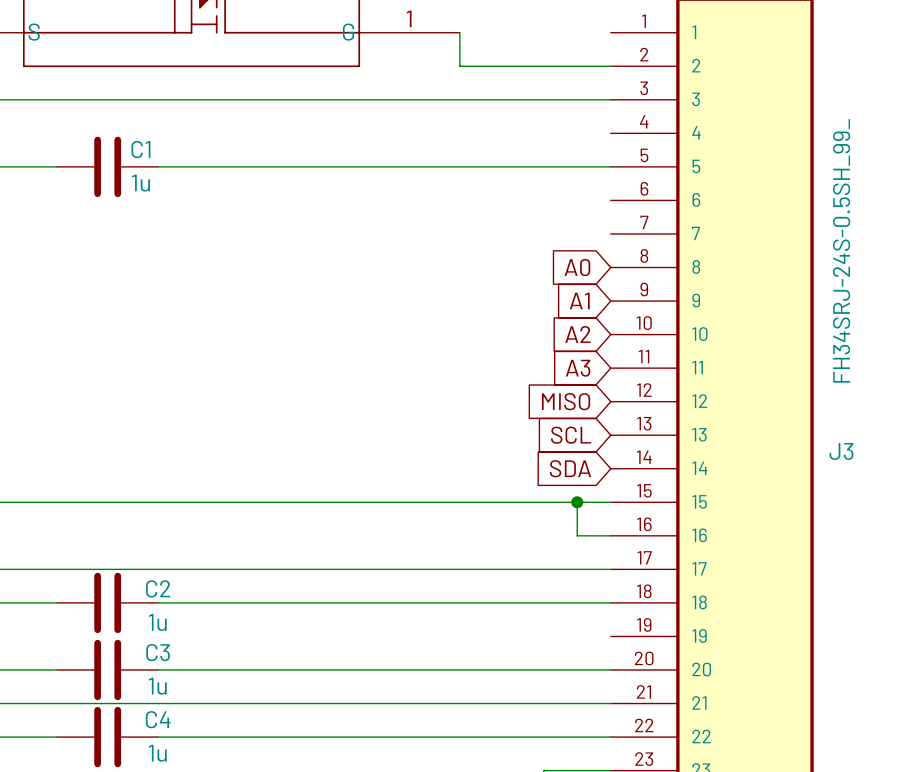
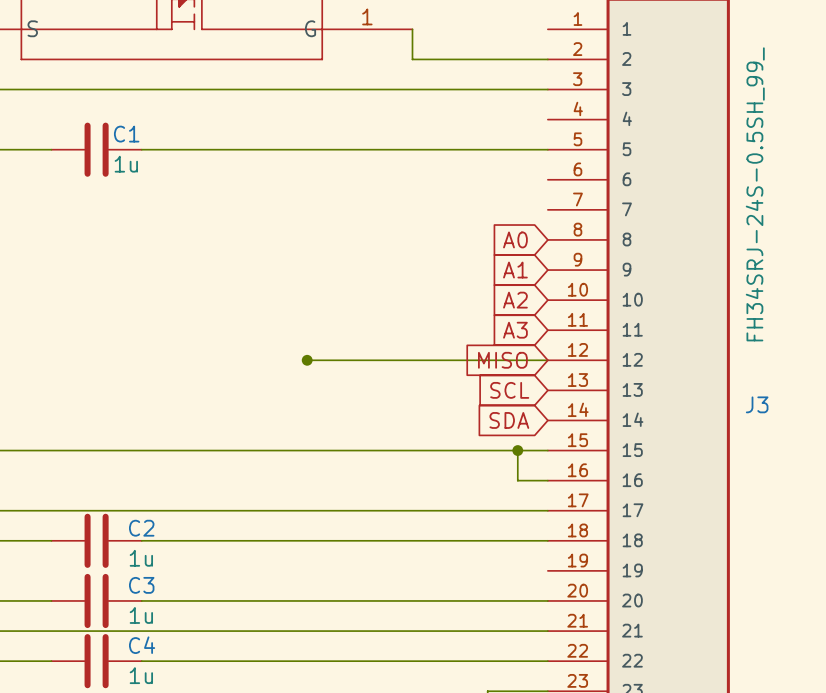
wire: none -> (307, 360) (547, 360)
junction: none -> (307, 360)

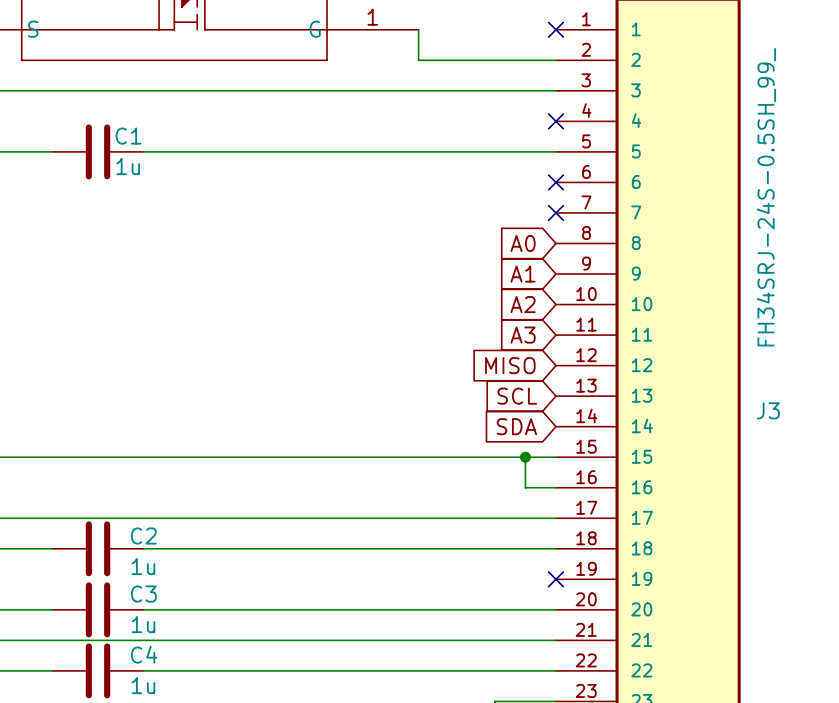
no-connect mark: none -> (555, 29)
no-connect mark: none -> (555, 121)
no-connect mark: none -> (555, 182)
no-connect mark: none -> (555, 212)
wire: (307, 360) (547, 360) -> none
junction: (307, 360) -> none
no-connect mark: none -> (555, 579)

